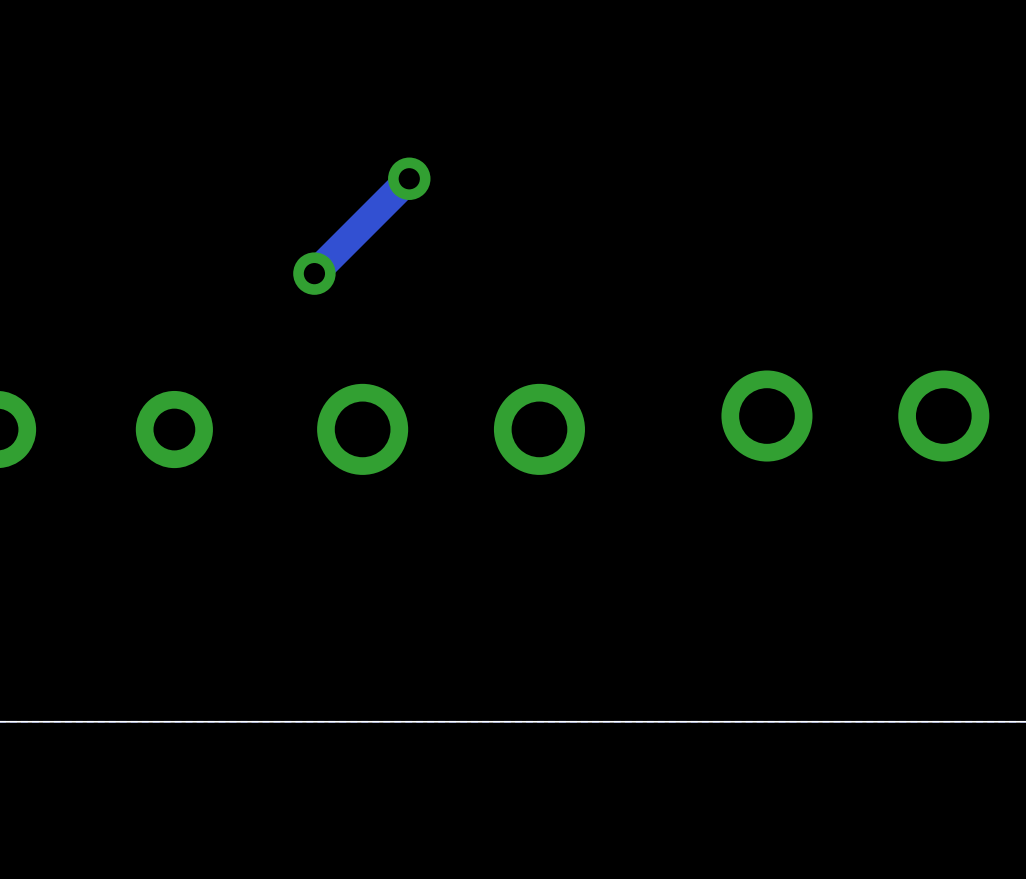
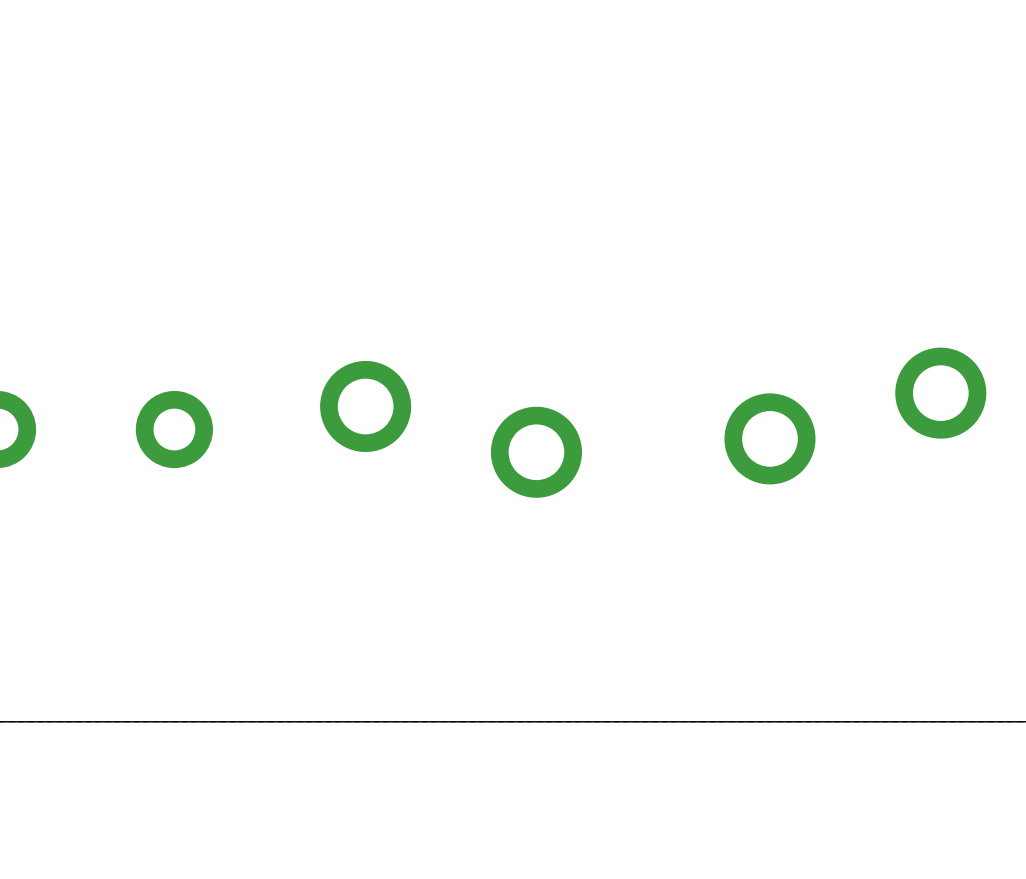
track: (409, 178) (314, 273) -> none
via: (409, 178) -> none
via: (314, 273) -> none
part rotation: 0° (855, 416) -> 15° counterclockwise (855, 416)
part rotation: 0° (451, 429) -> 15° clockwise (451, 429)

